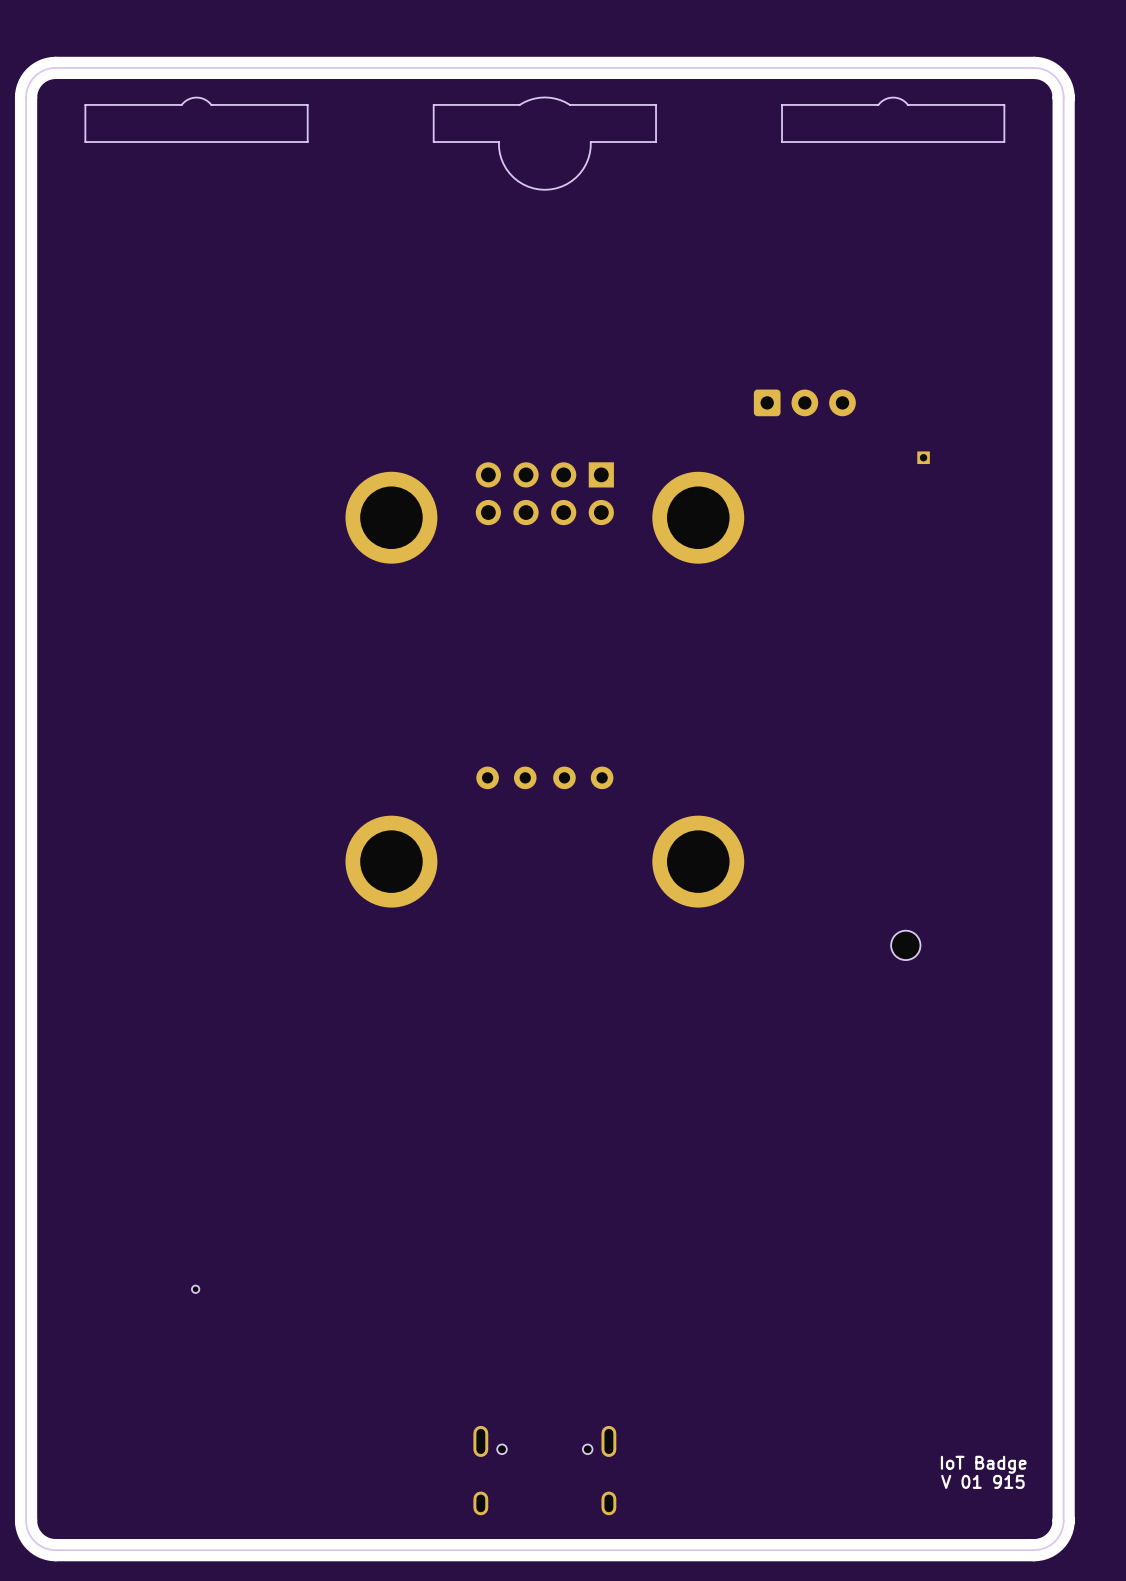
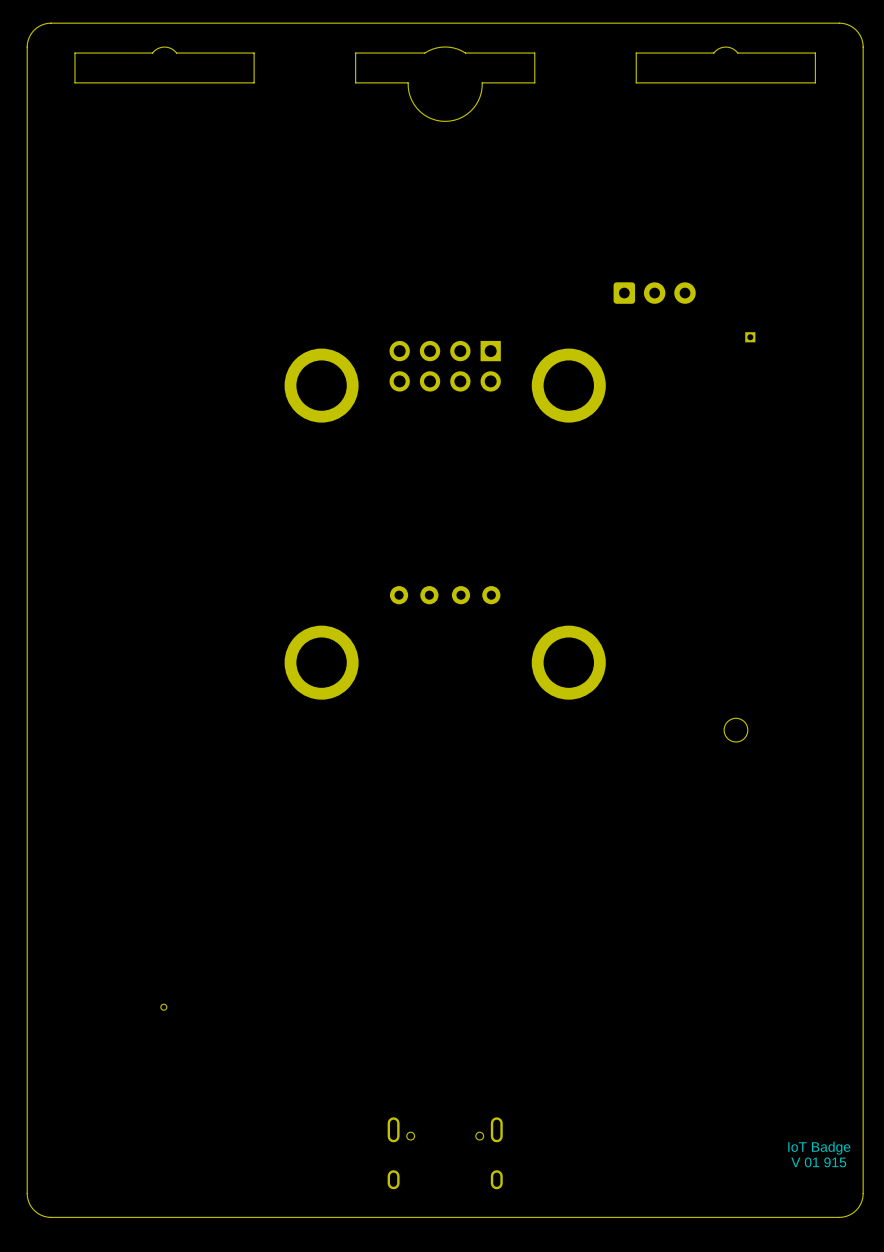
line: (1034, 67) (55, 67) (39, 72) (30, 81) (26, 97) (26, 1520) (29, 1533) (39, 1545) (55, 1550) (1034, 1550) (1046, 1547) (1059, 1536) (1063, 1520) (1063, 97) (1060, 84) (1054, 76) (1043, 69) (1034, 67) -> none
text position: IoT Badge (983, 1464) -> IoT Badge (819, 1148)
text position: V 01 915 (982, 1481) -> V 01 915 (818, 1162)

